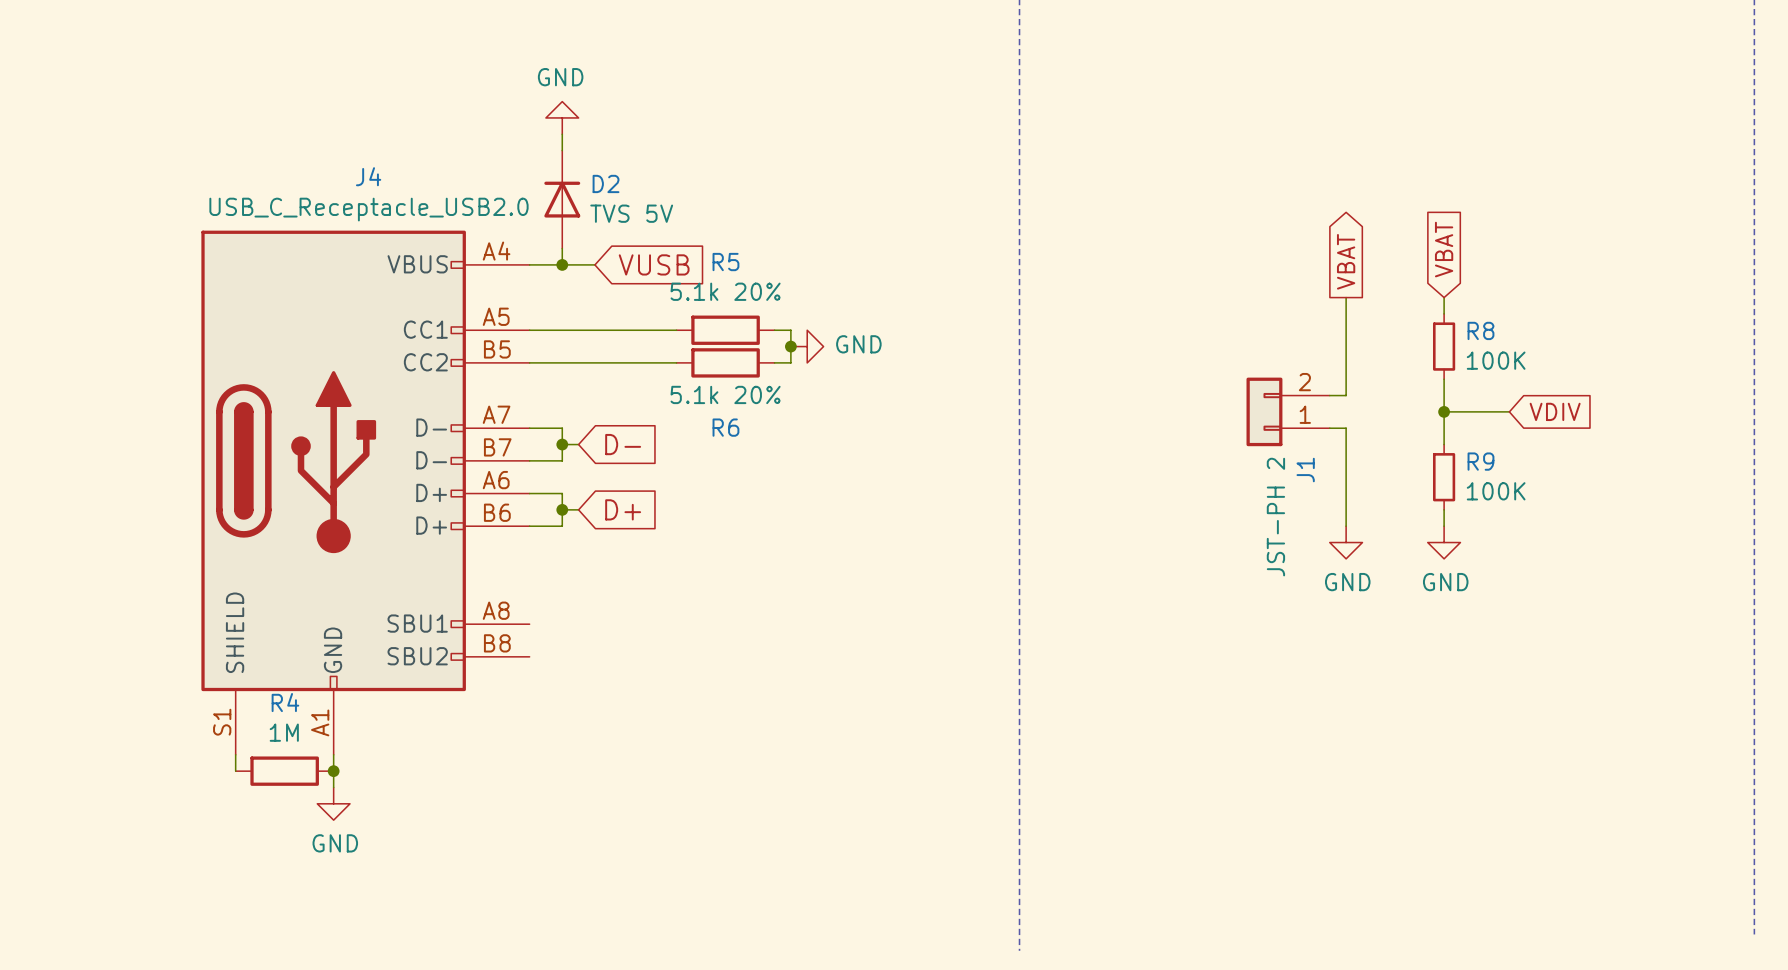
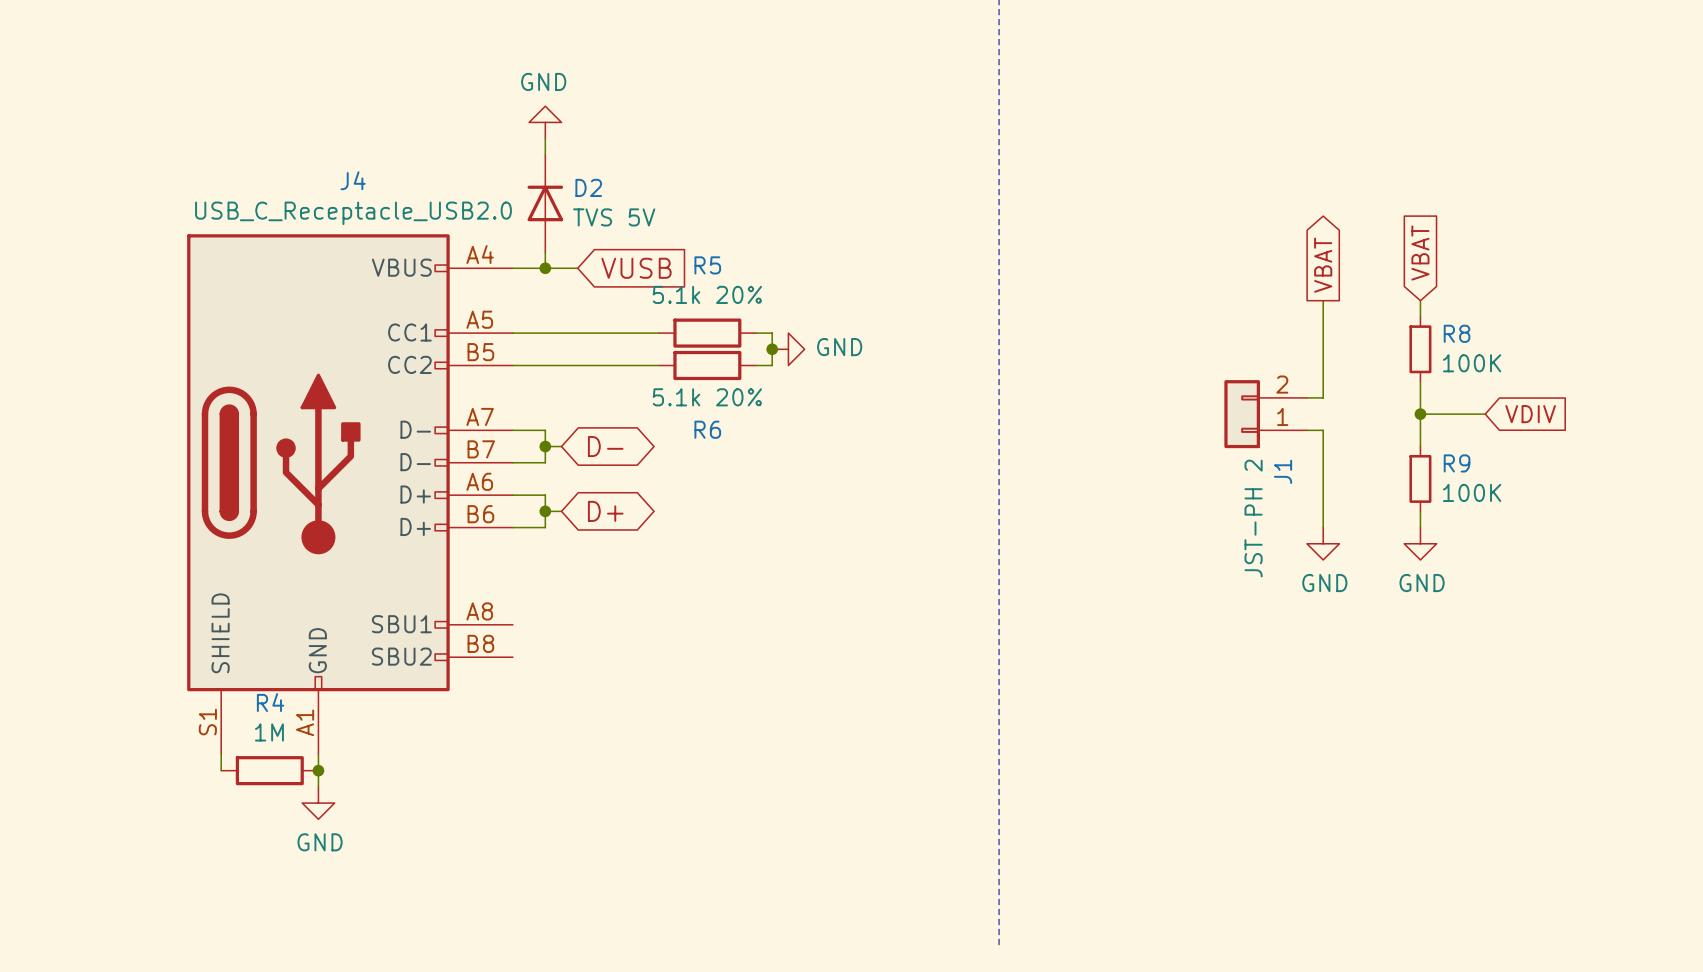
global label shape: input (623, 444) -> bidirectional (605, 446)
global label shape: input (623, 509) -> bidirectional (605, 511)

